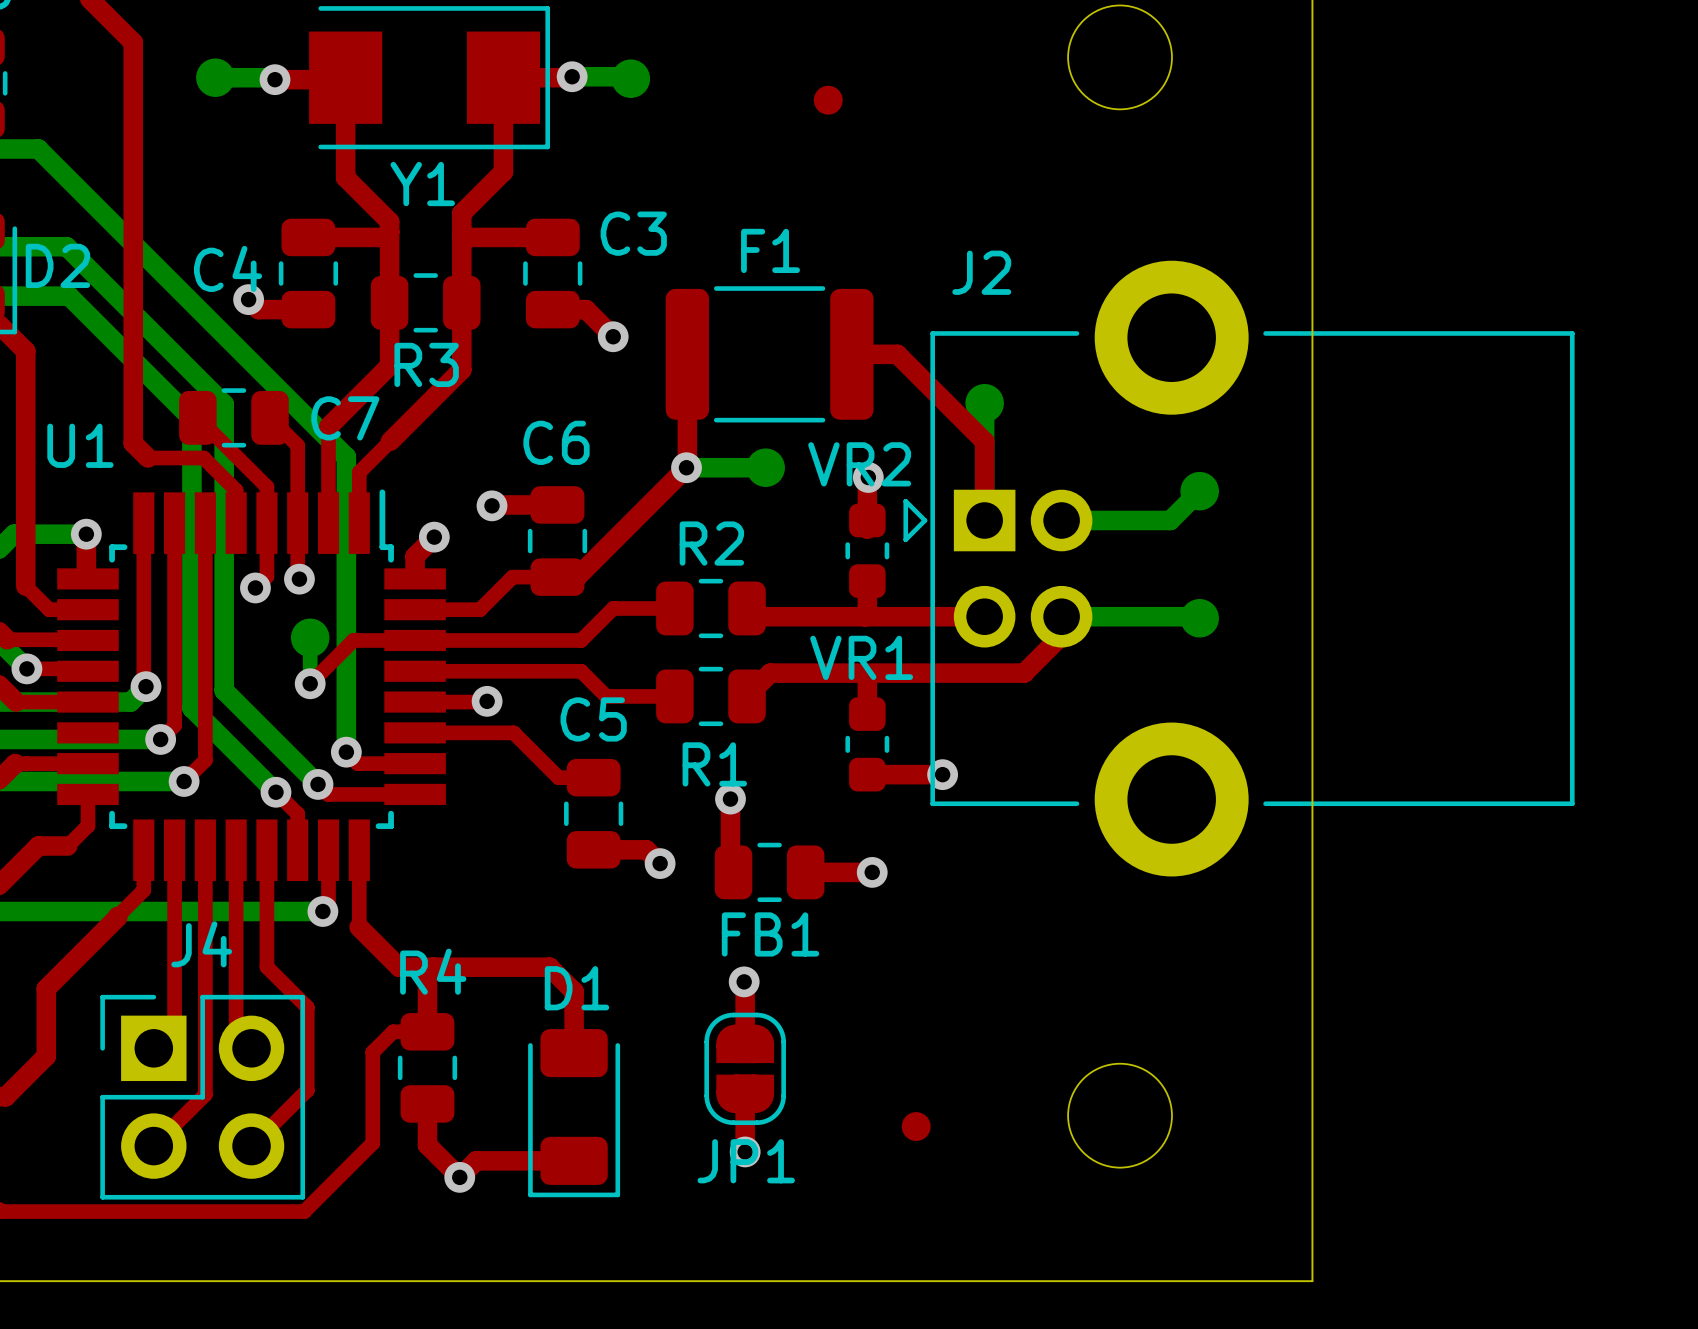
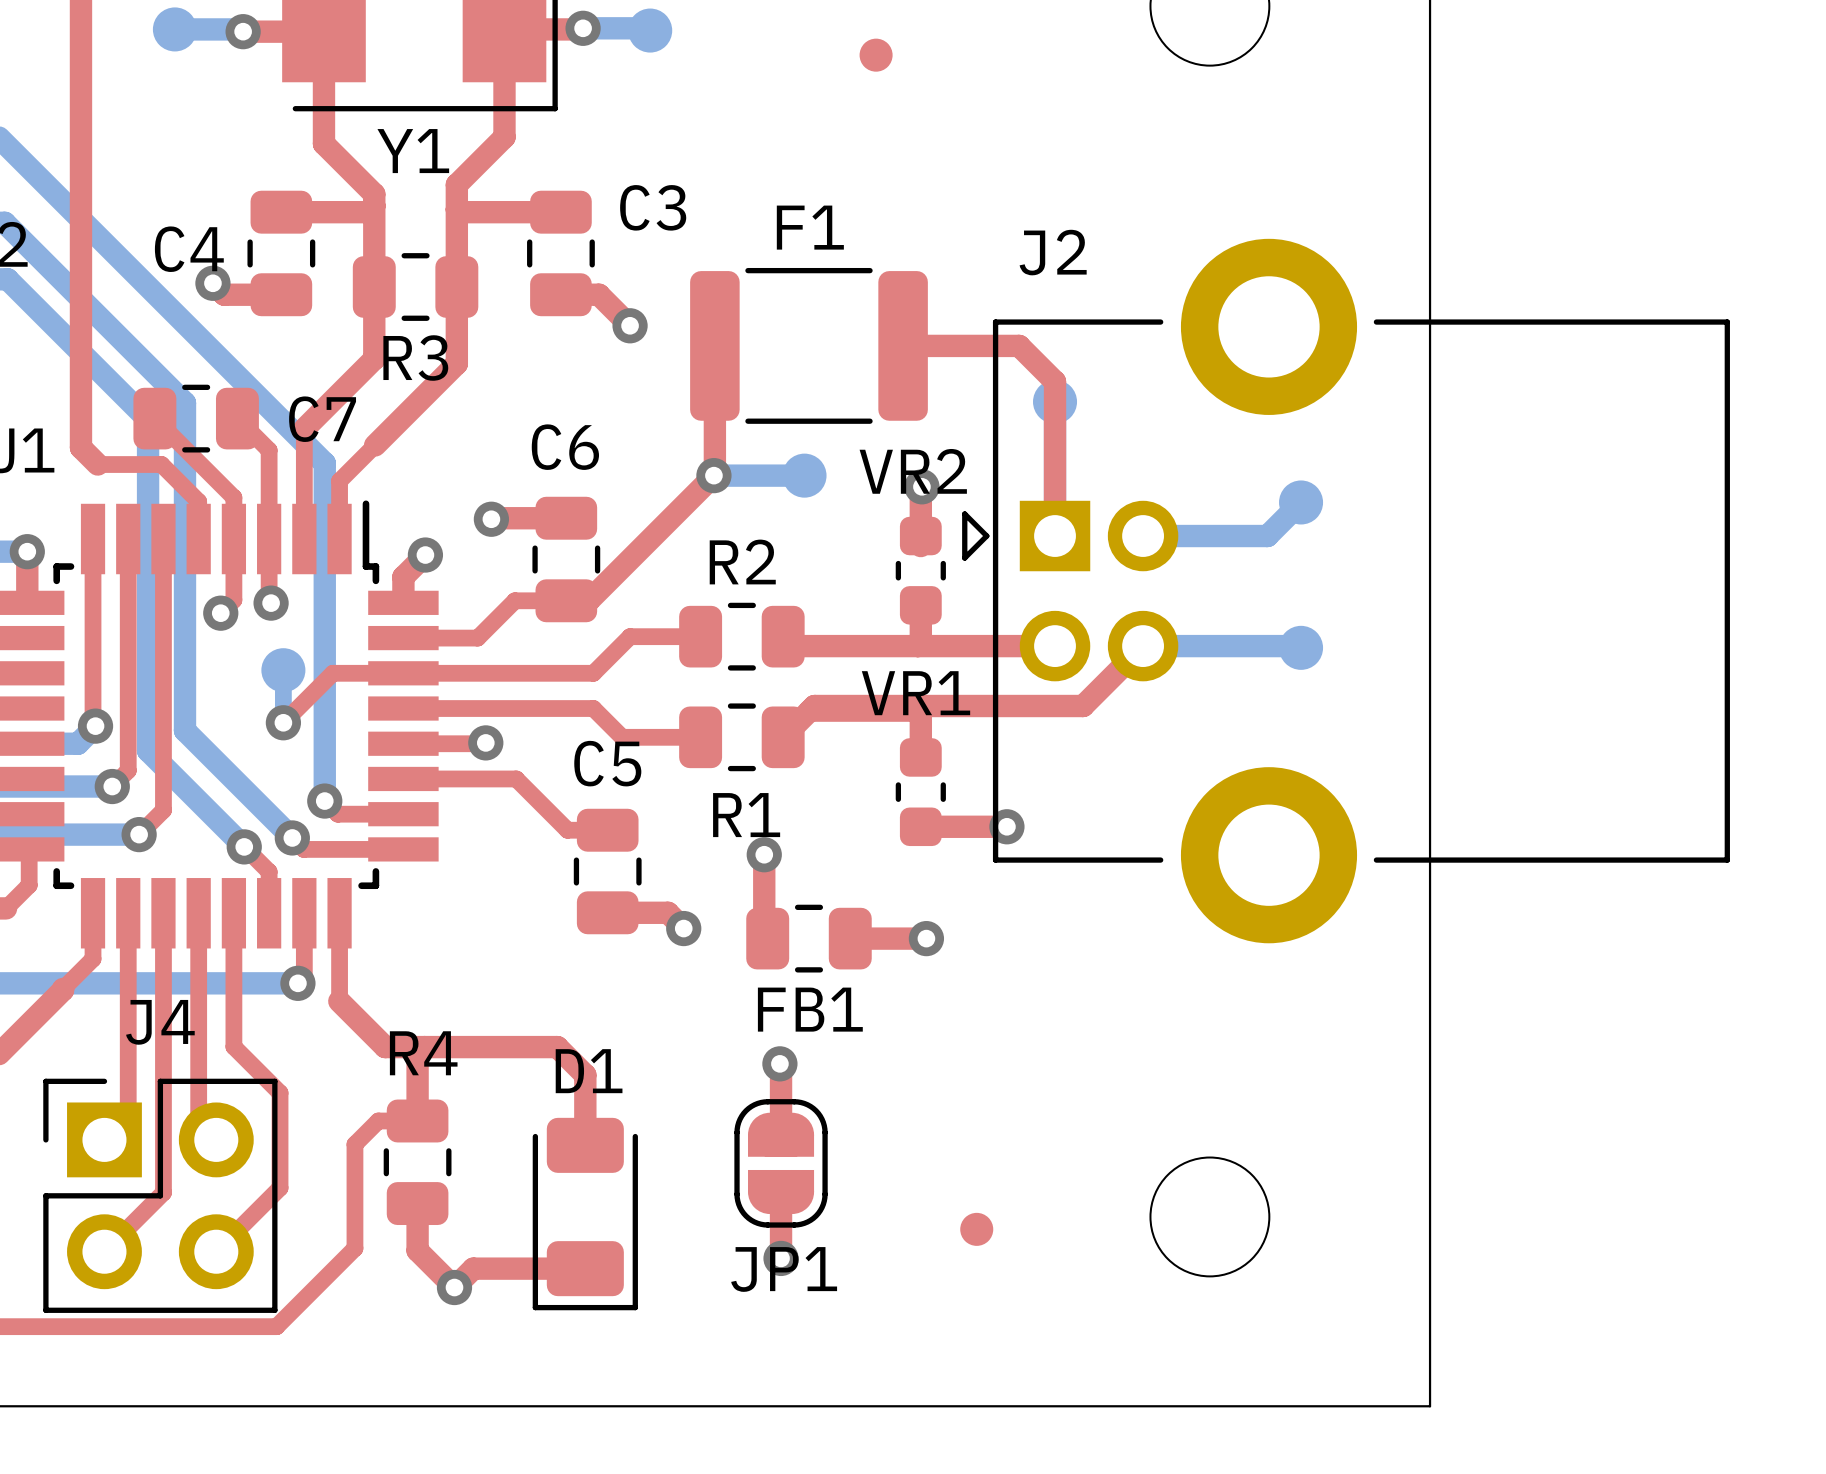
top track: (897, 354) (984, 441) -> (955, 345) (1019, 345) (1055, 381) (1055, 445)
top track: (1061, 616) (1061, 635) (1024, 673) (866, 673) -> (1143, 646) (1083, 706) (814, 706) (809, 710)

